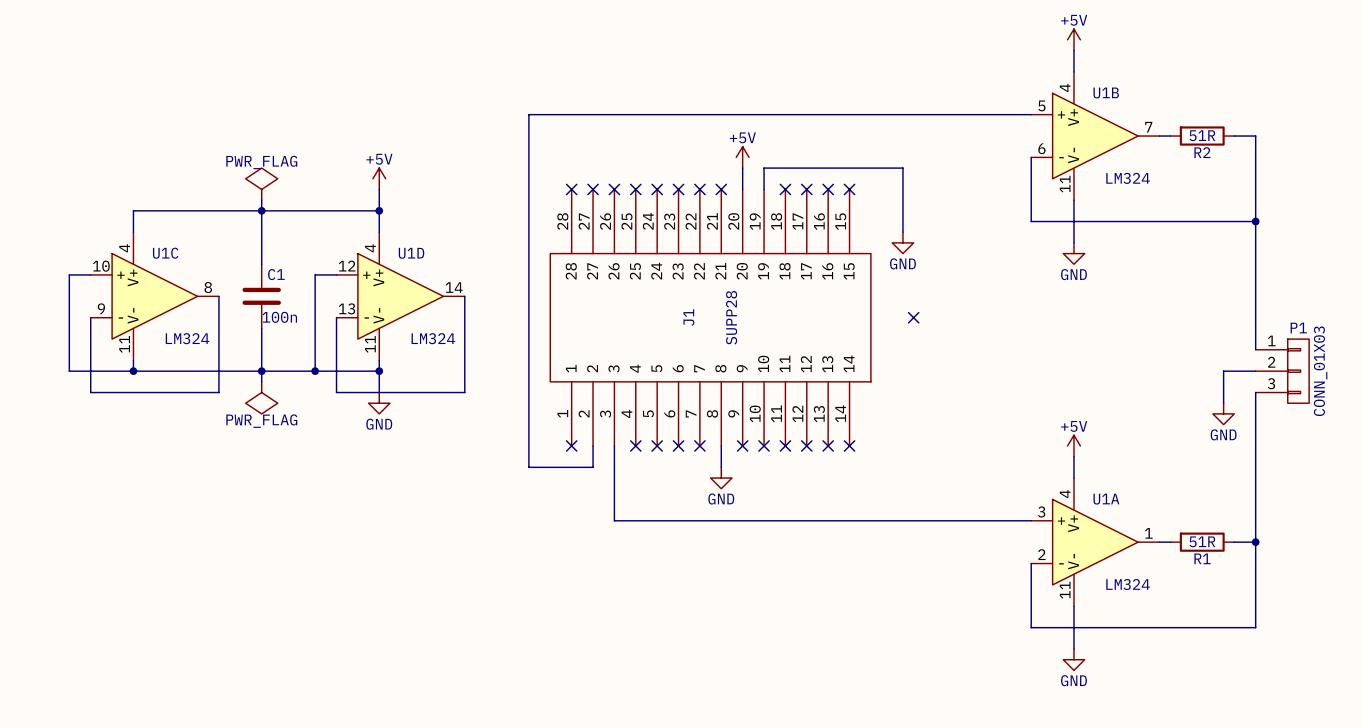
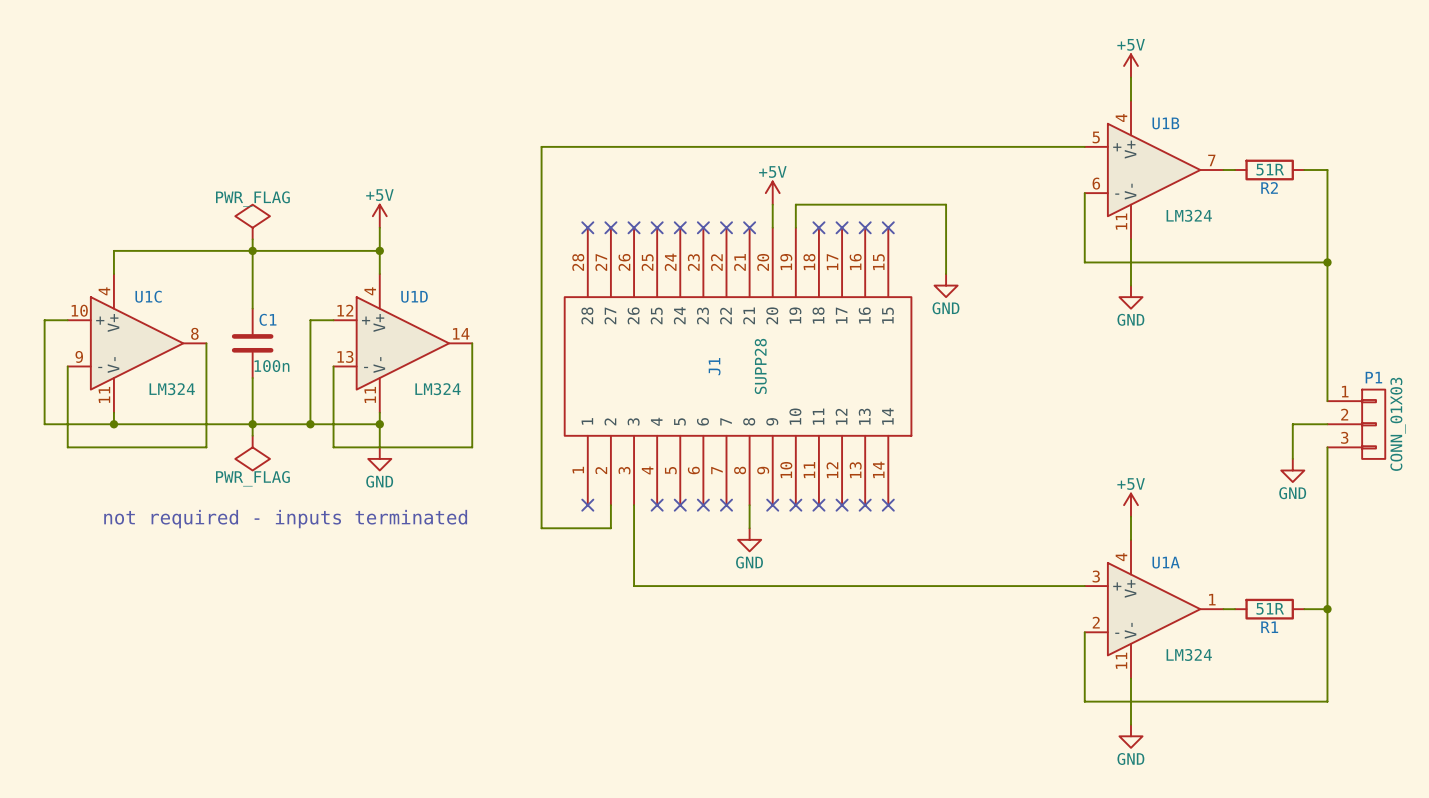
no-connect mark: (913, 317) -> none
text: none -> not required - inputs terminated (285, 519)

